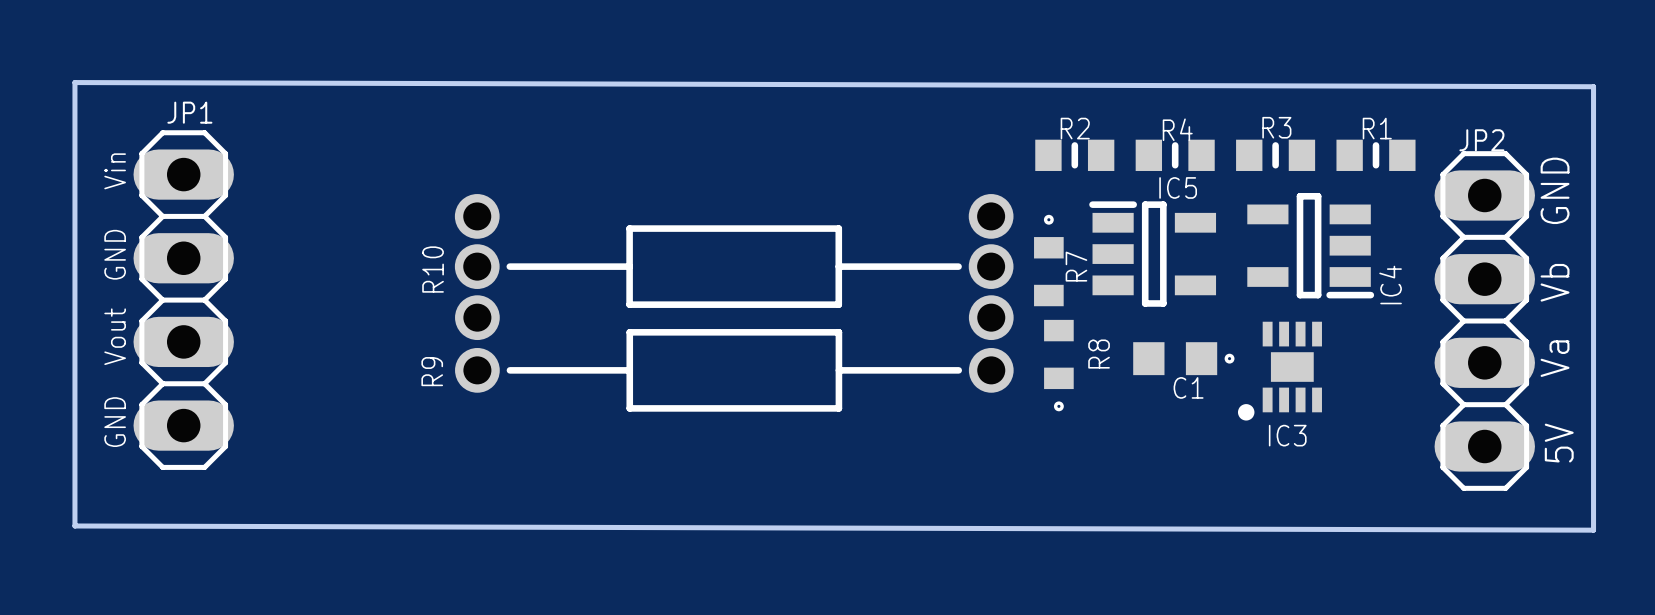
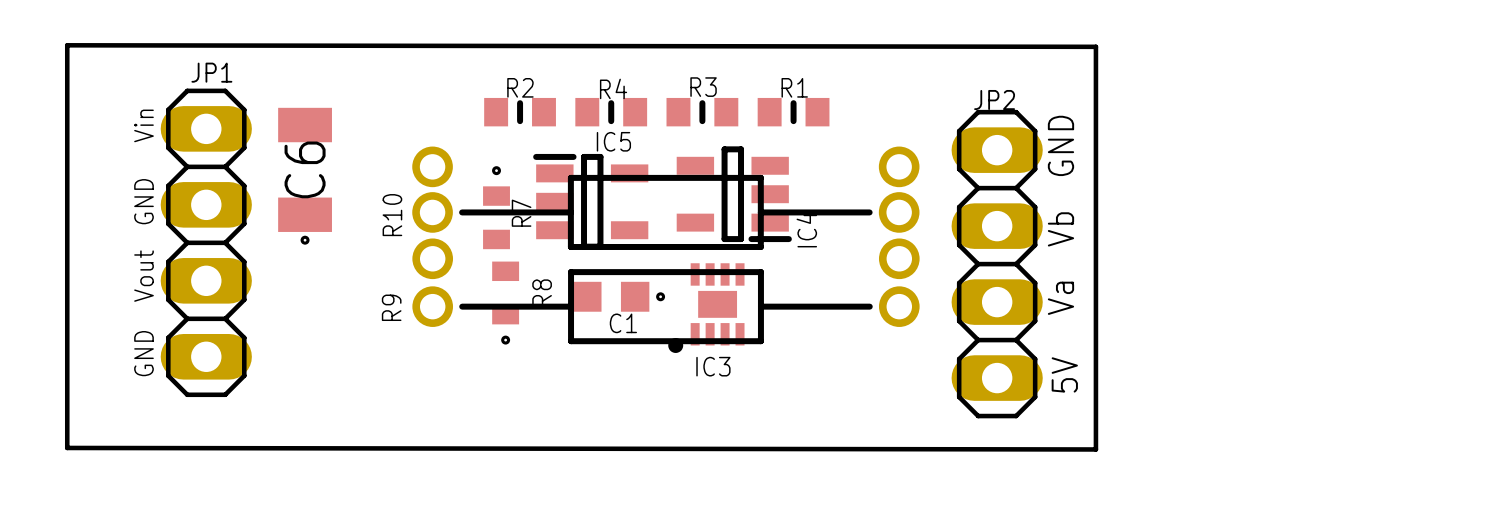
board edge: (74, 82) (1593, 86) (1593, 530) (74, 525) -> (67, 45) (1095, 46) (1095, 449) (67, 447)
R2 position: (1074, 155) -> (520, 112)
R4 position: (1175, 155) -> (611, 112)
R3 position: (1275, 155) -> (702, 112)
R1 position: (1376, 155) -> (793, 112)
text position: Vin (115, 171) -> Vin (144, 125)
text position: GND (1555, 190) -> GND (1060, 145)
C6: none -> (305, 176)
IC4 position: (1310, 245) -> (734, 194)
text position: GND (115, 254) -> GND (144, 201)
IC5 position: (1152, 254) -> (590, 201)
R7 position: (1048, 260) -> (496, 207)
text position: Vb (1555, 282) -> Vb (1060, 229)
JP1 position: (183, 300) -> (206, 242)
JP2 position: (1484, 321) -> (997, 264)
text position: Vout (115, 336) -> Vout (144, 276)
C1 position: (1183, 358) -> (619, 296)
text position: Va (1555, 358) -> Va (1060, 298)
R8 position: (1058, 365) -> (505, 303)
IC3 position: (1279, 371) -> (706, 308)
text position: GND (115, 422) -> GND (144, 353)
text position: 5V (1559, 443) -> 5V (1064, 374)

